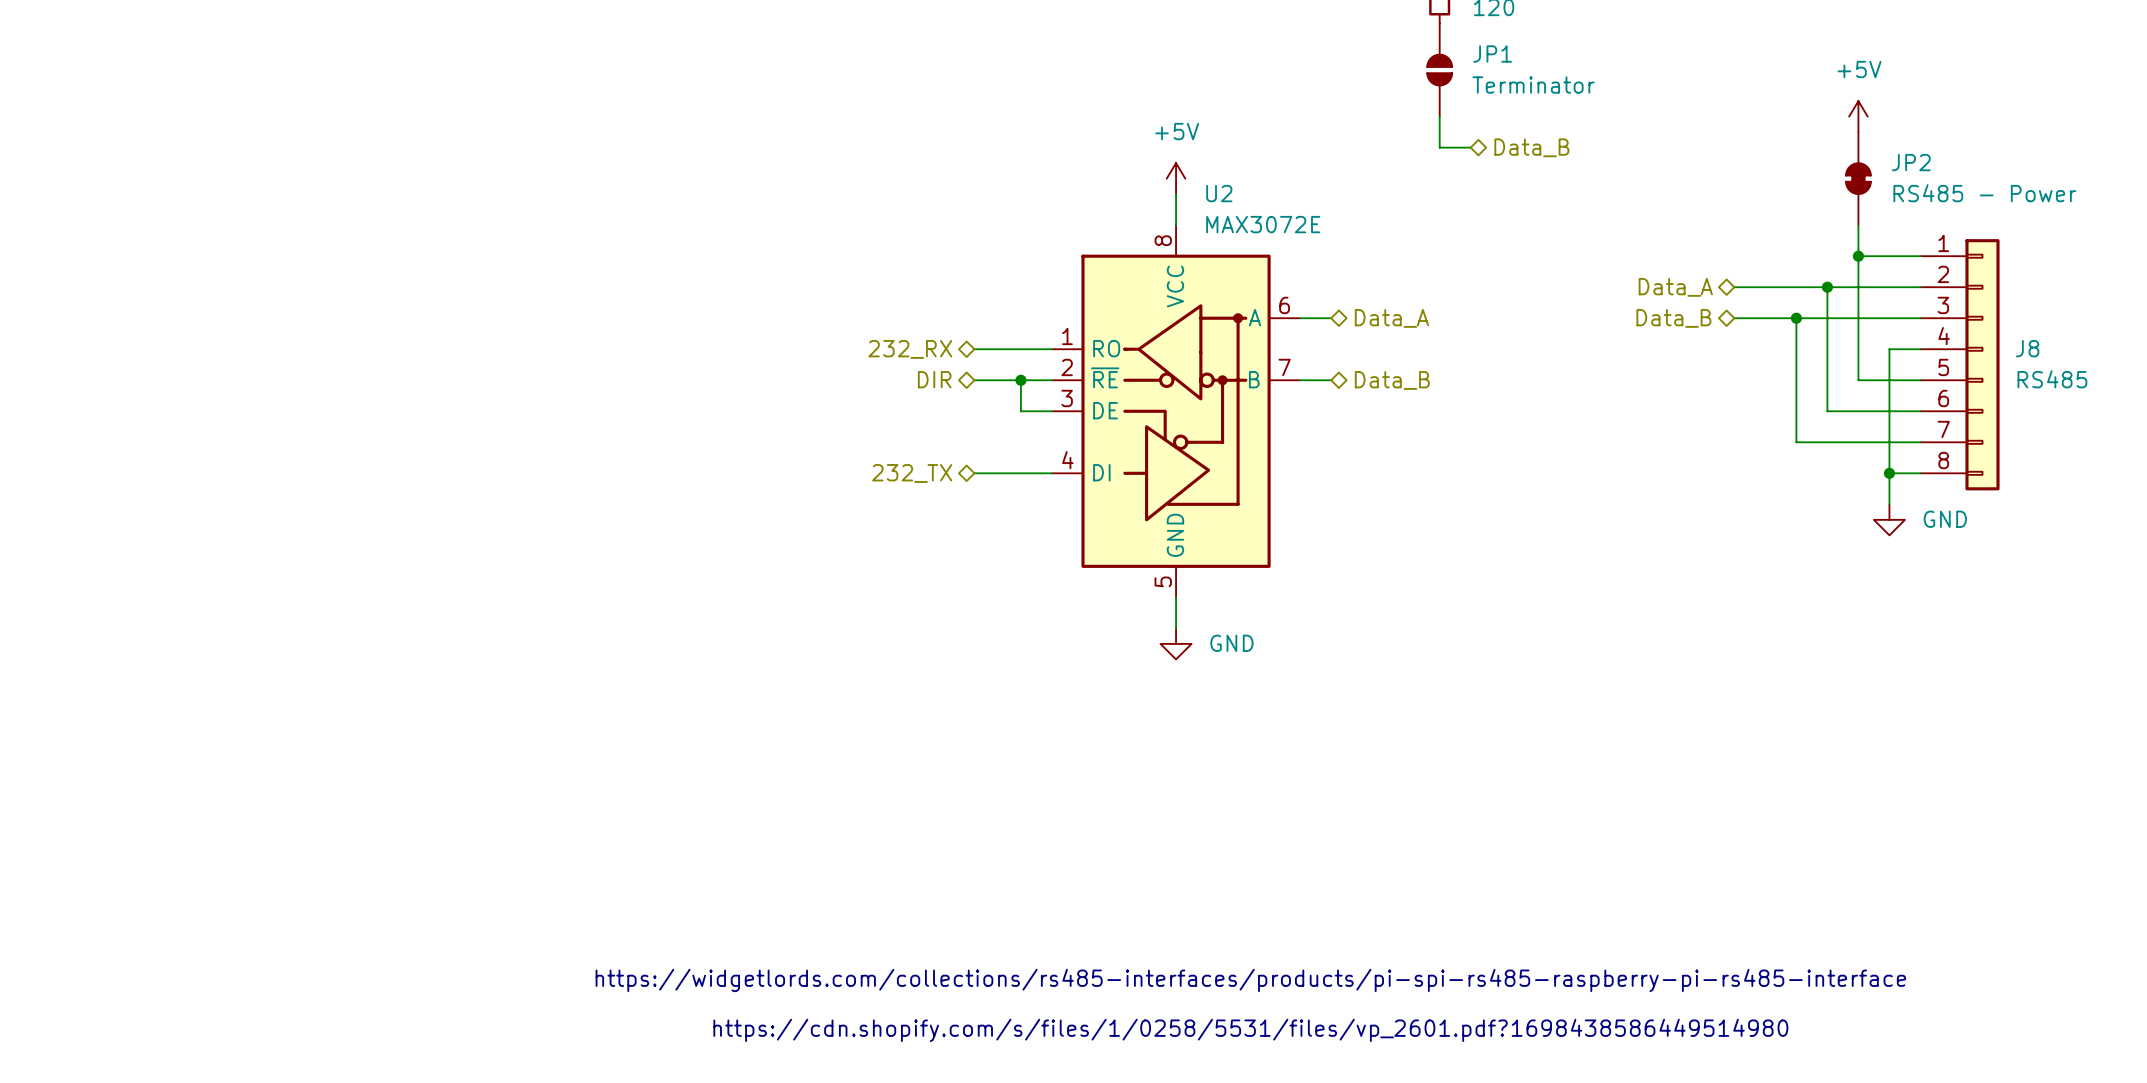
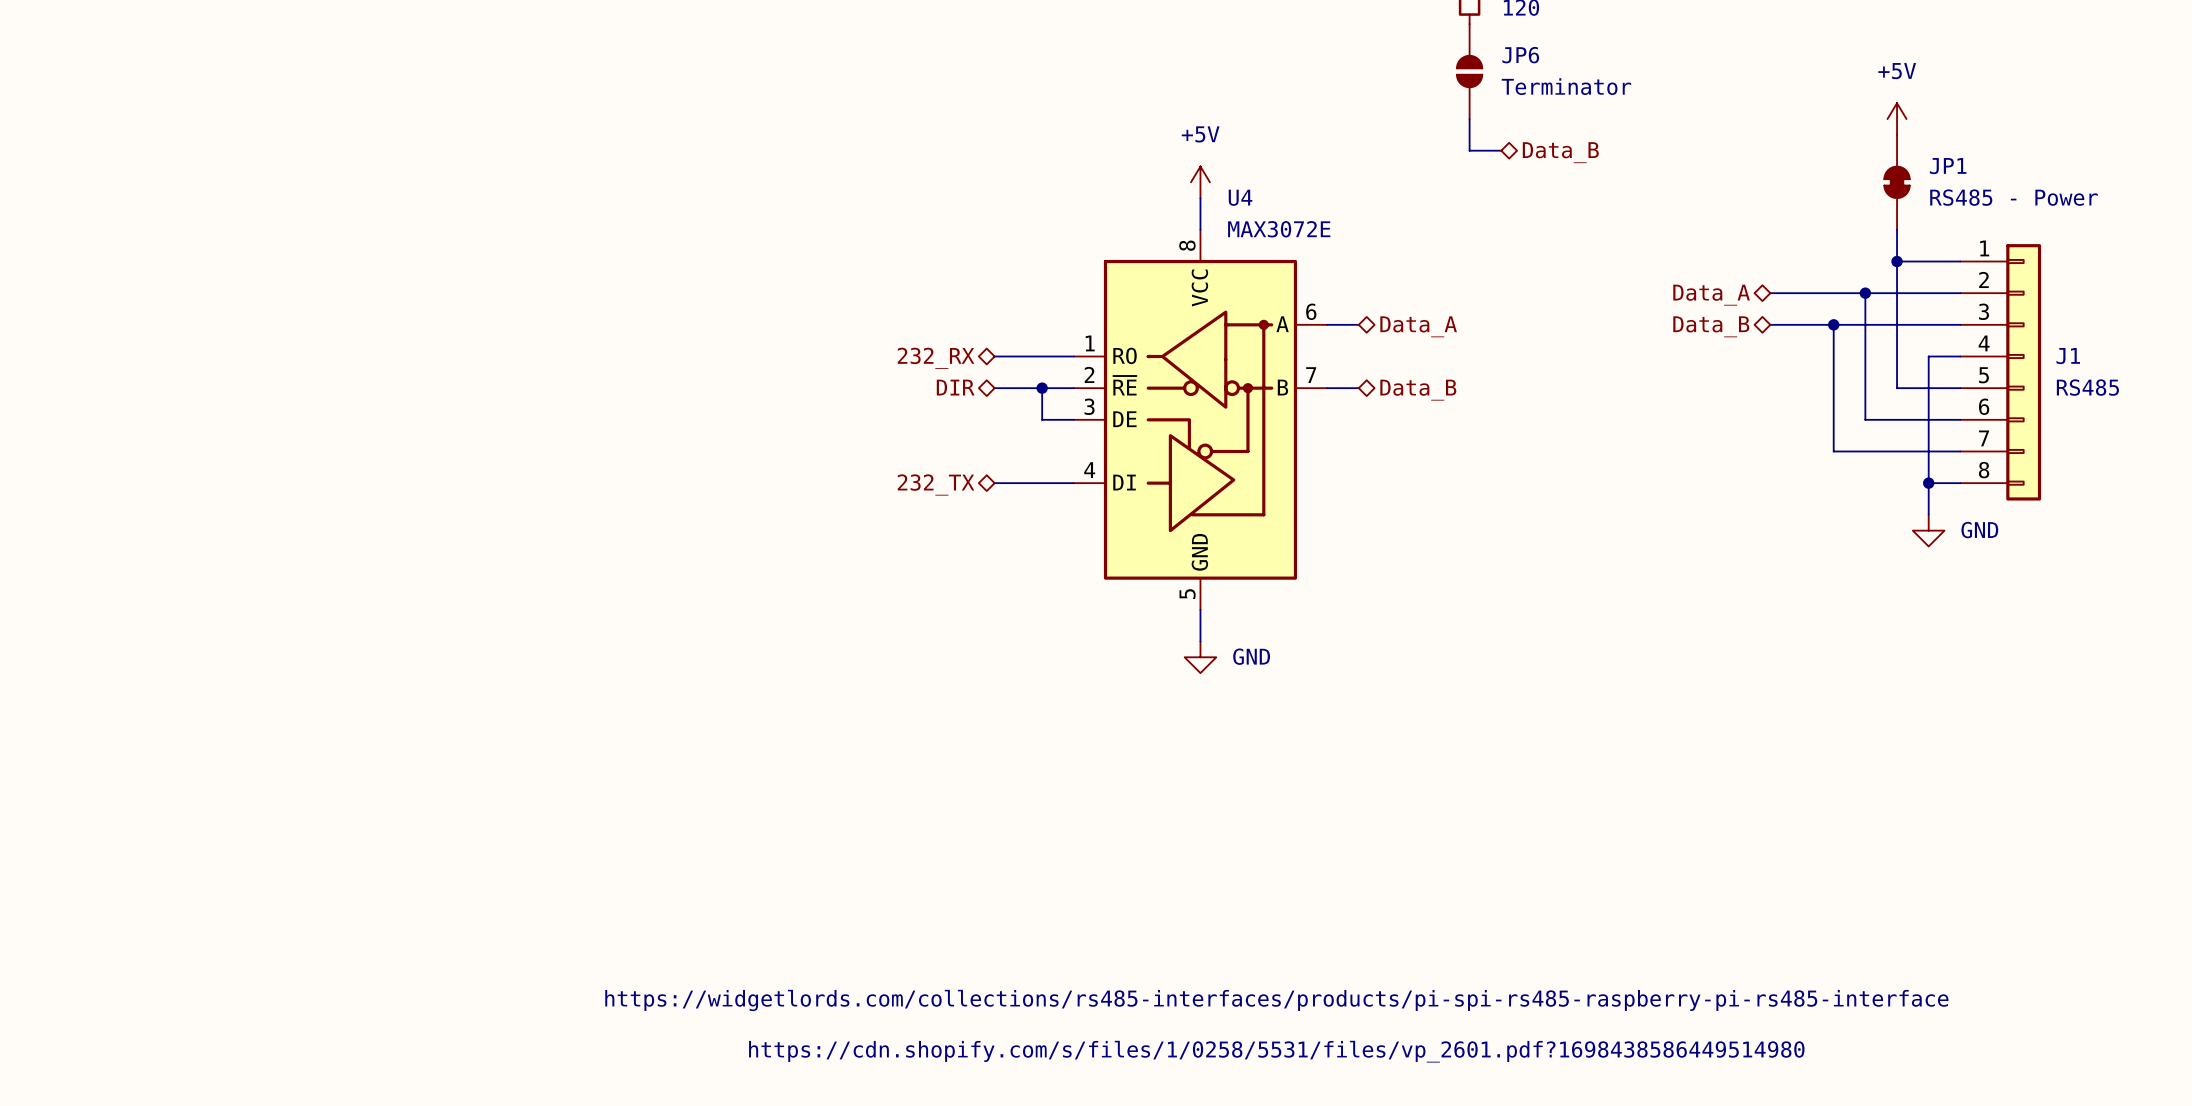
JP1 name: JP1 (1492, 54) -> JP6 (1520, 55)
JP2 name: JP2 (1911, 162) -> JP1 (1948, 166)
U2 name: U2 (1219, 193) -> U4 (1240, 197)
J8 name: J8 (2027, 348) -> J1 (2068, 356)

